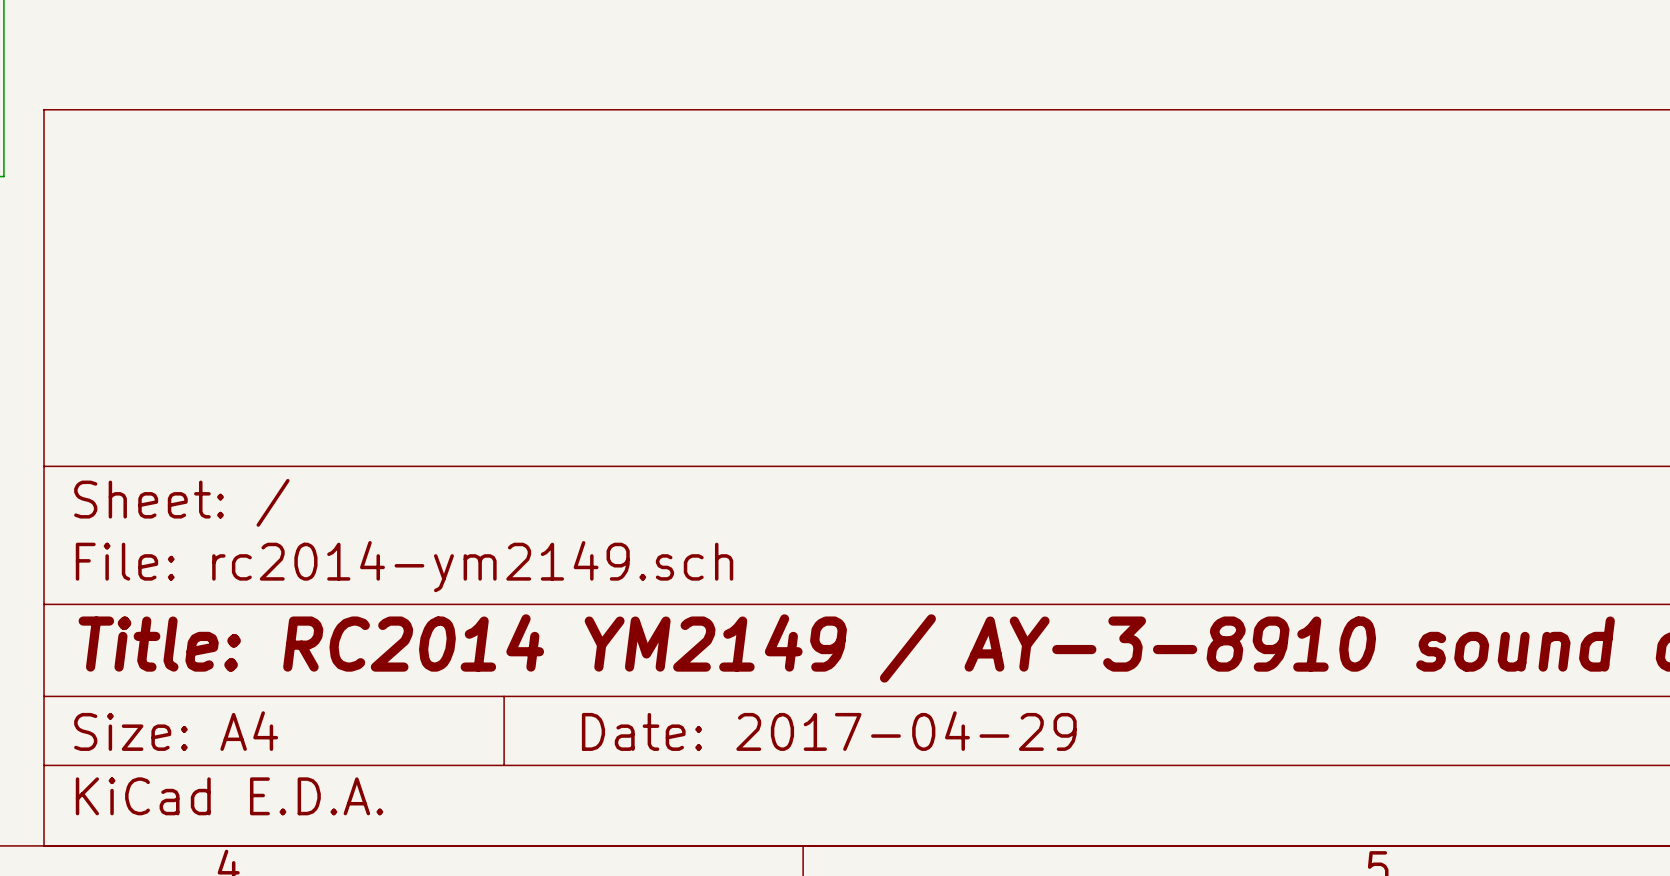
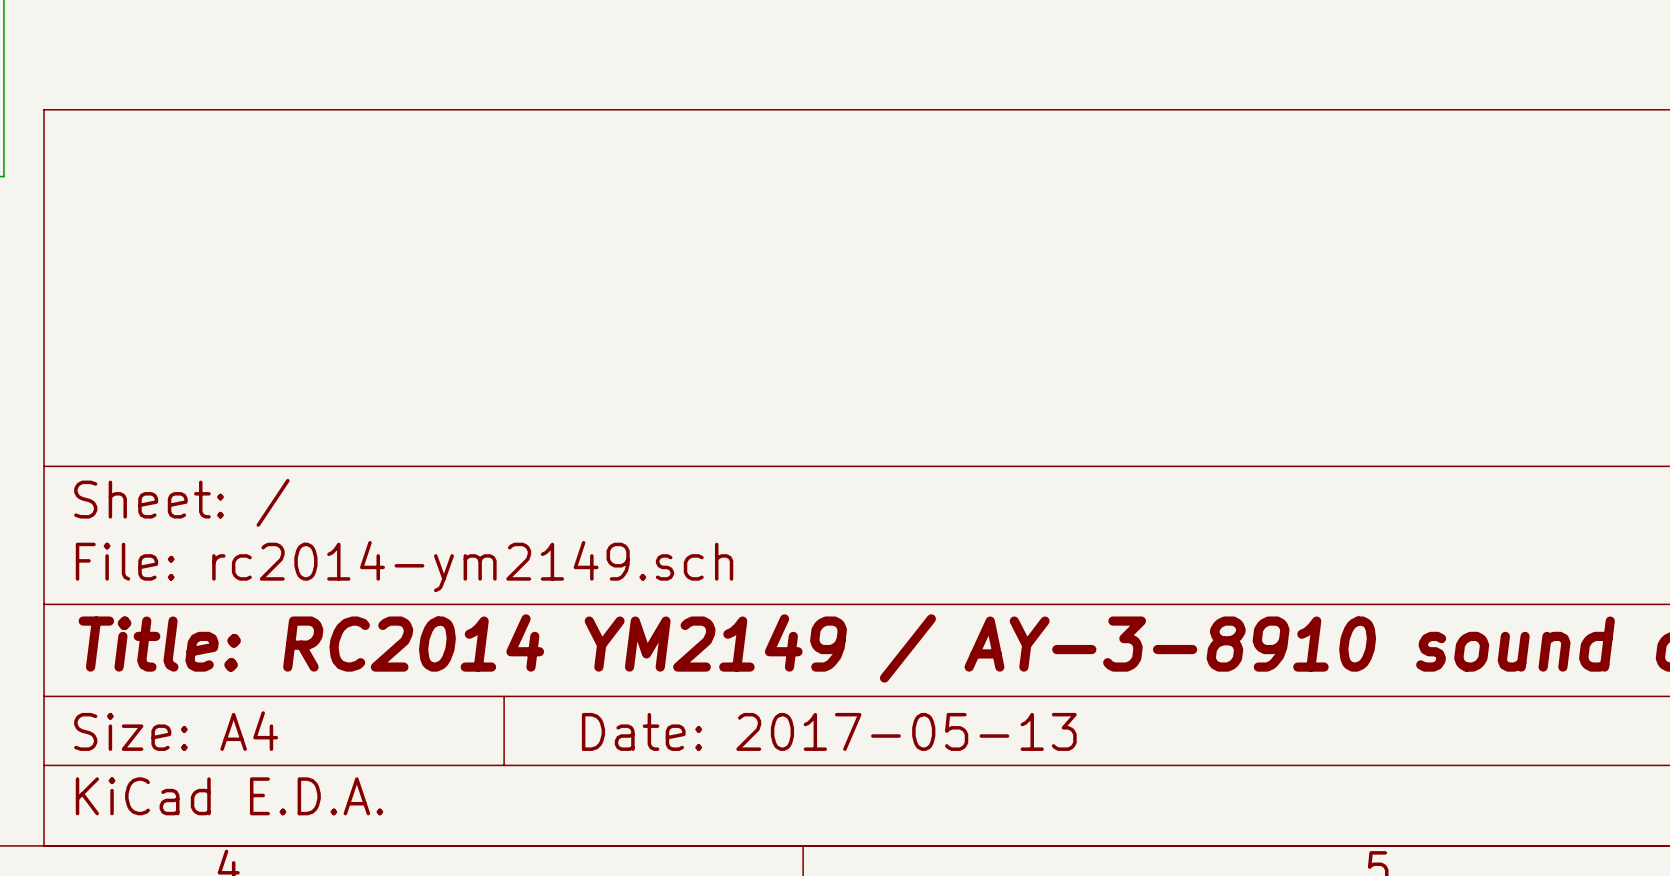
title block: Date: 2017-04-29 (829, 731) -> Date: 2017-05-13 (829, 731)

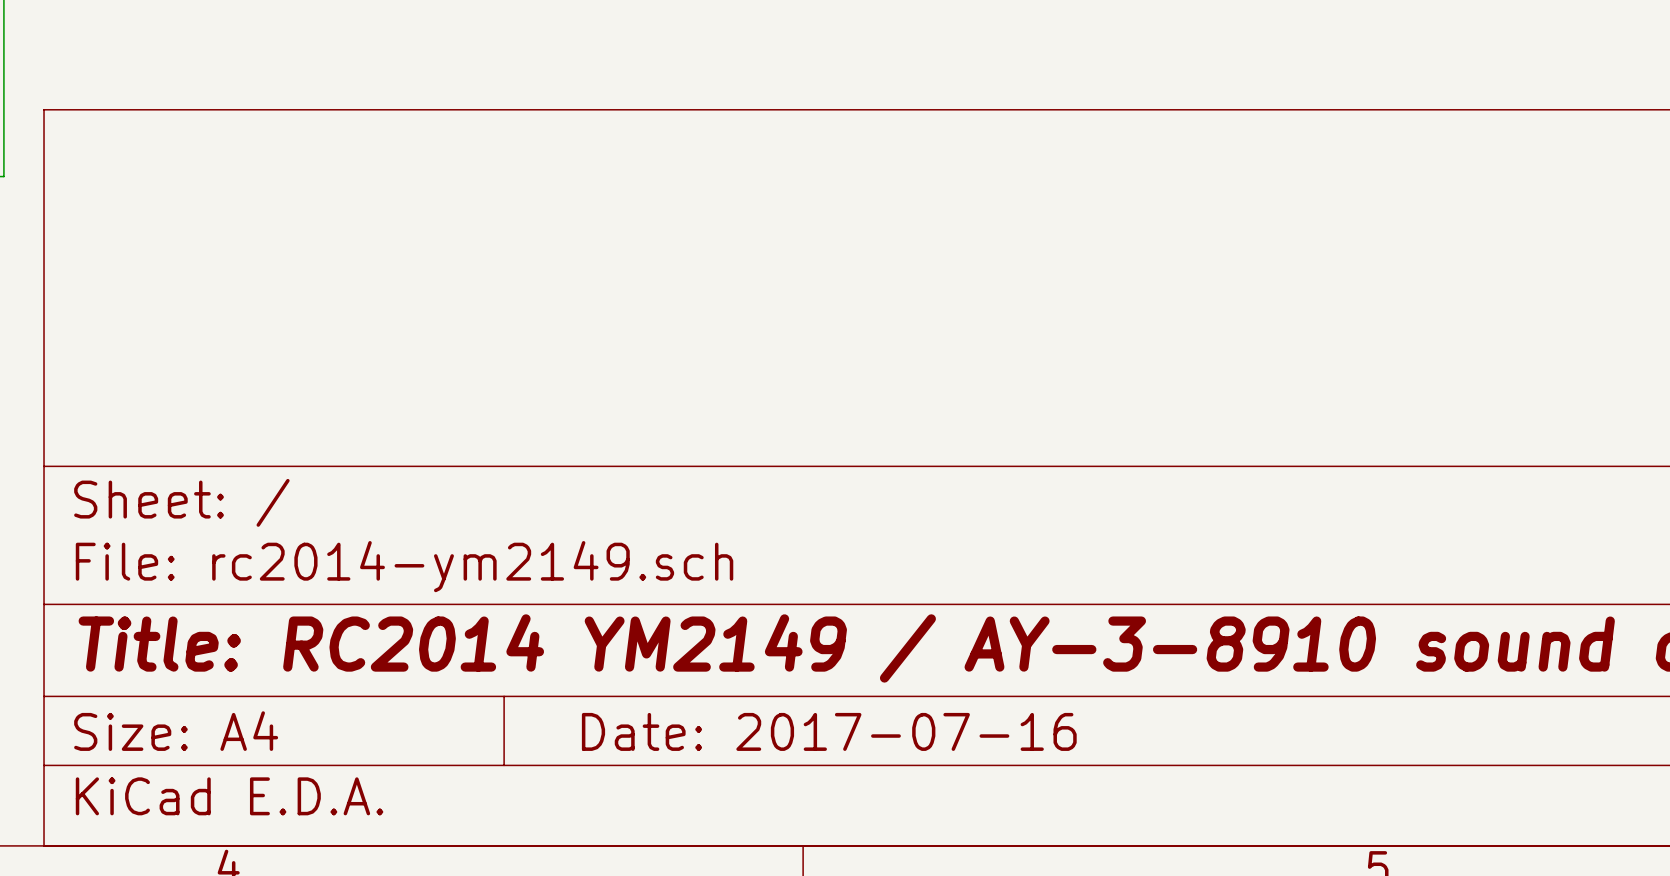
title block: Date: 2017-05-13 (829, 731) -> Date: 2017-07-16 (829, 731)

